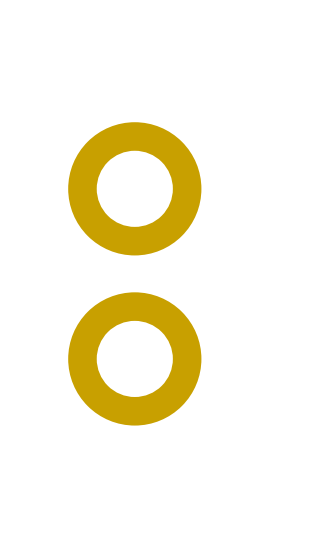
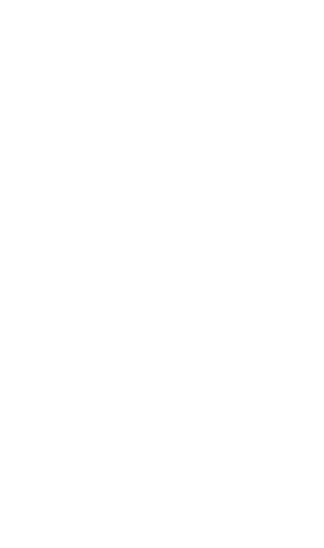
part: (134, 188) -> none
part: (134, 358) -> none

